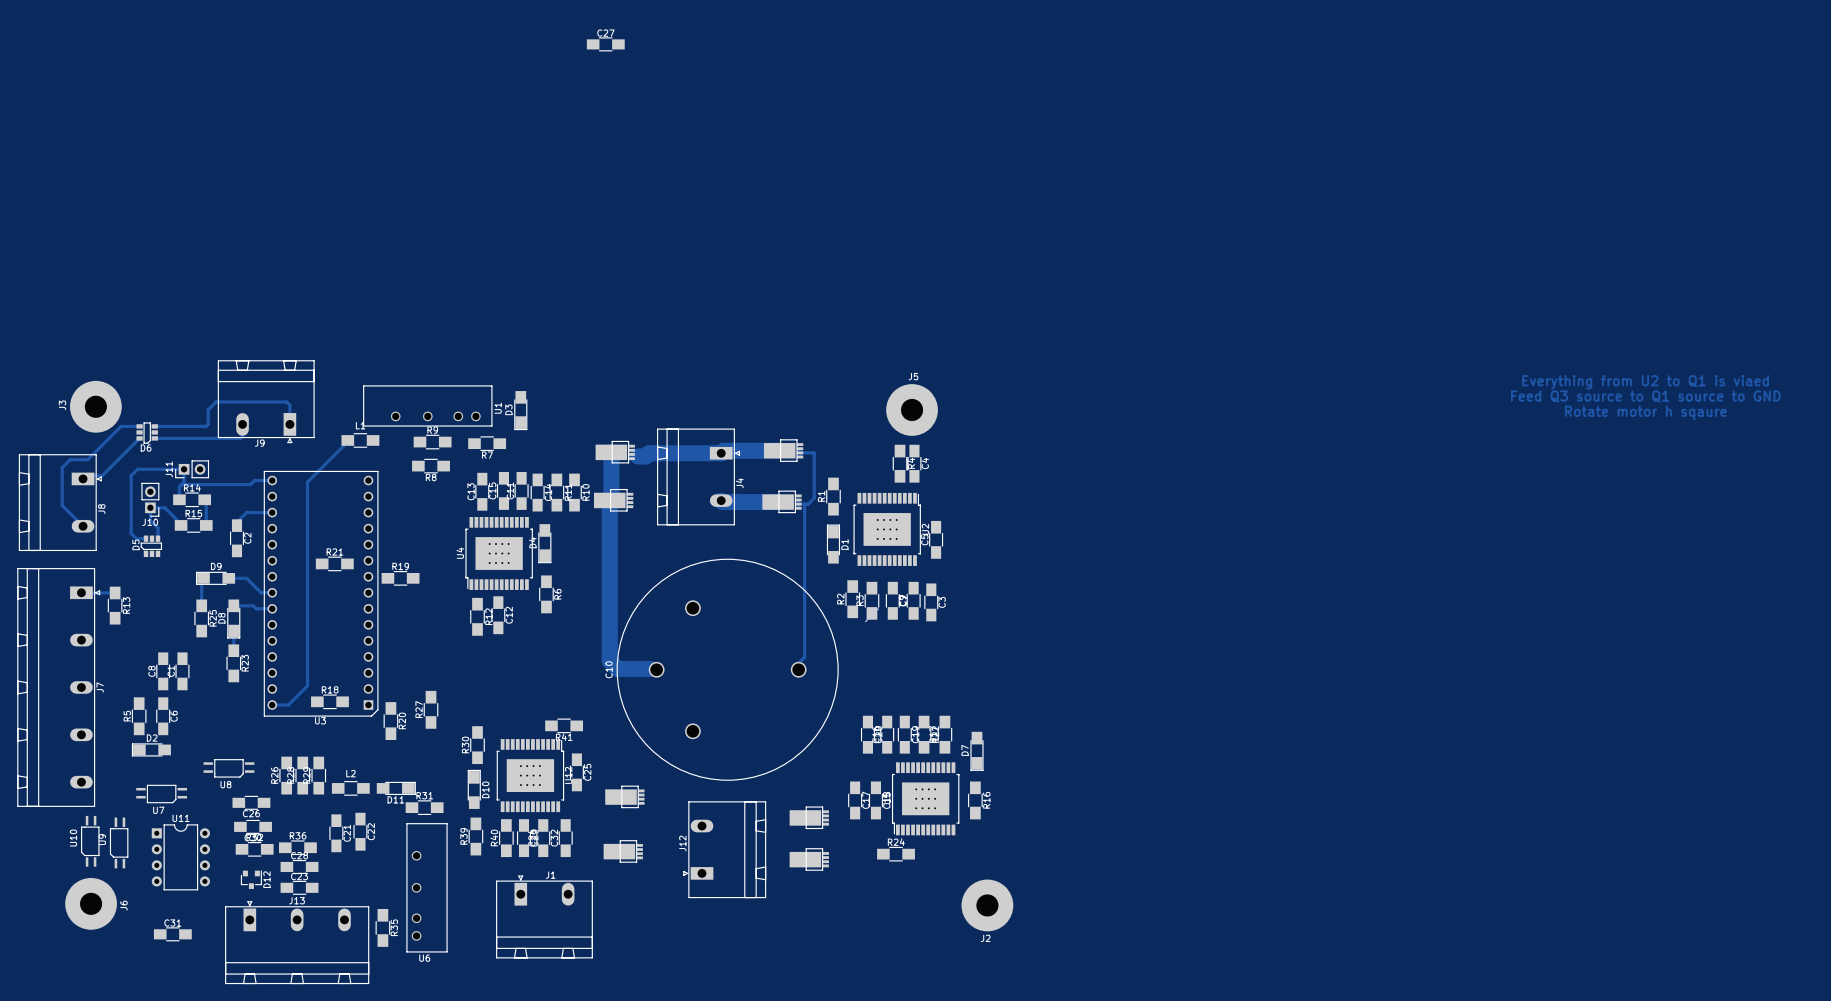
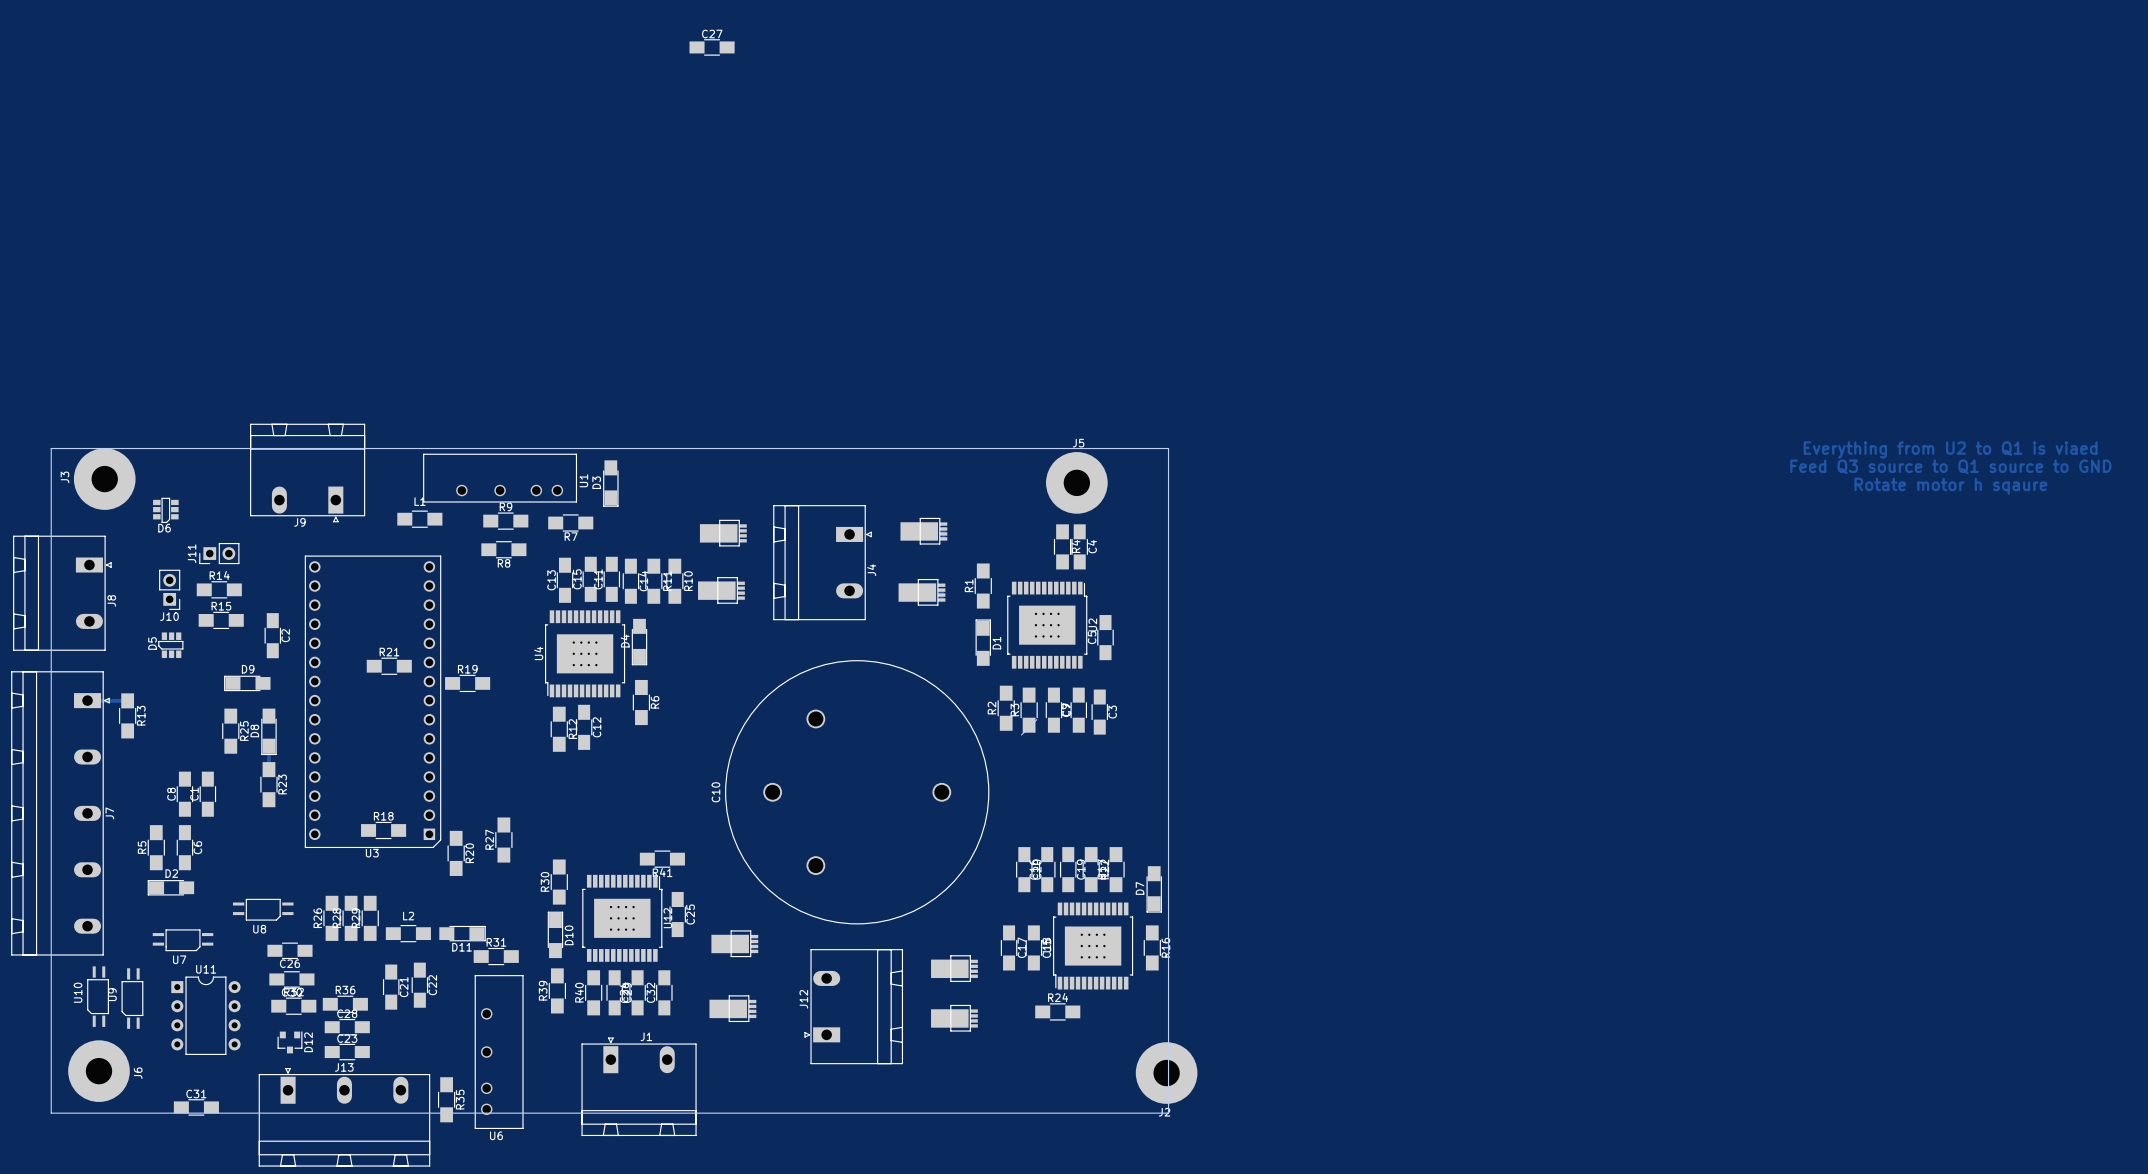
board edge: none -> (51, 448) (51, 1113) (1168, 1113) (1168, 448) (51, 448)
track: (242, 424) (242, 436) (240, 438) (154, 438) -> none
track: (289, 424) (289, 405) (286, 401) (216, 401) (208, 409) (208, 424) (206, 426) (154, 426) -> none
track: (139, 426) (121, 426) (87, 459) (70, 459) (62, 467) (62, 505) (83, 526) -> none
track: (139, 438) (102, 475) (86, 475) (83, 478) -> none
track: (347, 440) (307, 482) (307, 685) (288, 705) (272, 705) -> none
track: (779, 450) (649, 453) (645, 456) (637, 456) -> none
track: (611, 452) (609, 660) (617, 668) (651, 668) -> none
track: (800, 452) (814, 453) (814, 498) (808, 504) (798, 504) -> none
track: (272, 480) (254, 480) (250, 484) (181, 484) -> none
track: (179, 499) (179, 486) (184, 482) (184, 469) (137, 469) (131, 475) (131, 533) (136, 538) (146, 538) -> none
track: (204, 499) (206, 501) (206, 525) -> none
track: (721, 500) (778, 502) -> none
track: (804, 504) (804, 657) (793, 668) -> none
track: (272, 512) (246, 512) (236, 522) (236, 525) -> none
track: (181, 525) (164, 507) (150, 507) (150, 520) (157, 528) (157, 538) -> none
track: (203, 578) (201, 580) (201, 605) -> none
track: (228, 578) (246, 578) (261, 592) (272, 592) -> none
track: (233, 605) (253, 605) (256, 608) (272, 608) -> none

